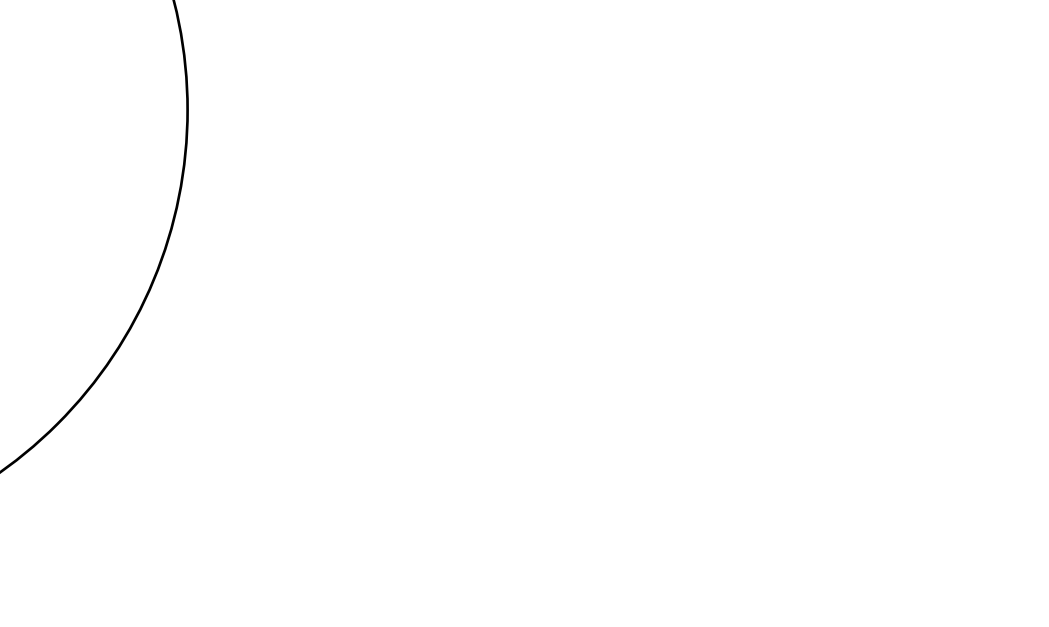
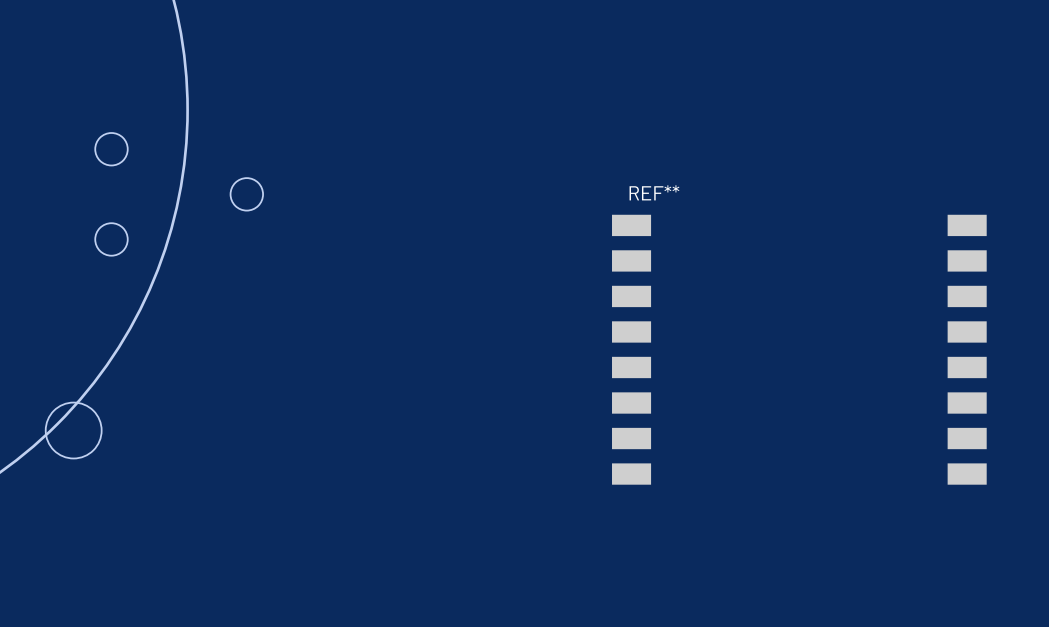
round board edge: none -> [94, 132, 129, 167]
round board edge: none -> [229, 177, 264, 212]
round board edge: none -> [94, 222, 129, 257]
REF**: none -> (799, 349)
round board edge: none -> [44, 401, 103, 460]

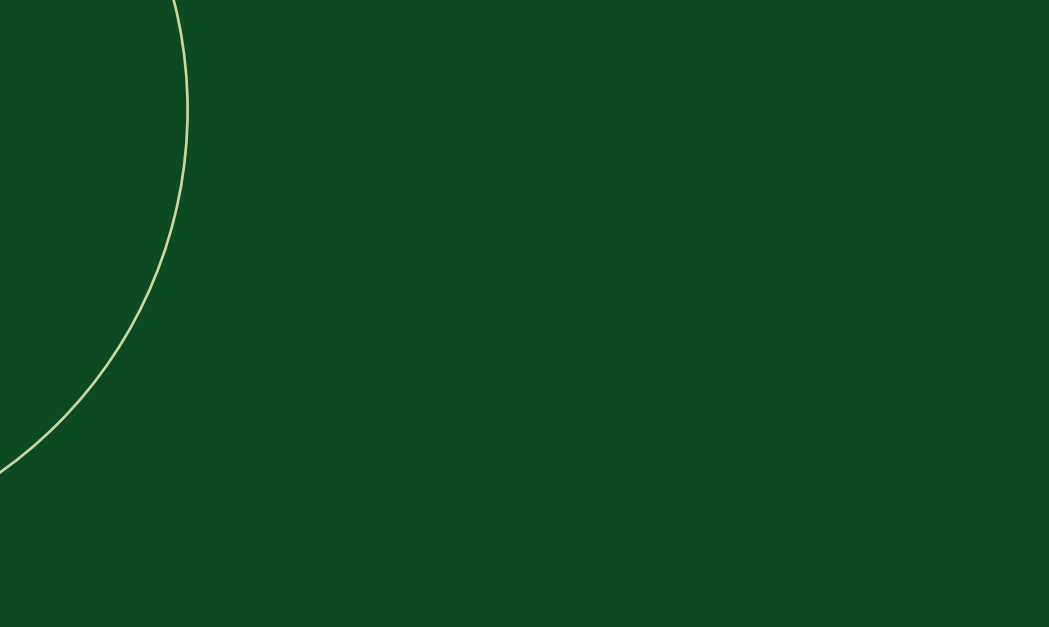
round board edge: [94, 132, 129, 167] -> none
round board edge: [229, 177, 264, 212] -> none
round board edge: [94, 222, 129, 257] -> none
REF**: (799, 349) -> none
round board edge: [44, 401, 103, 460] -> none

